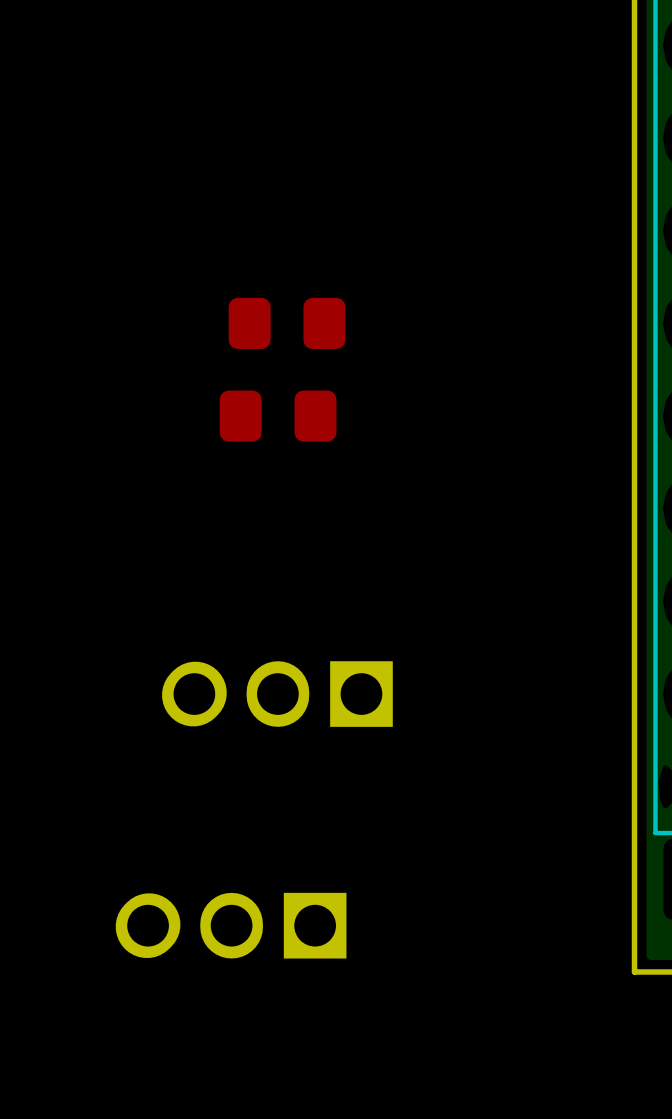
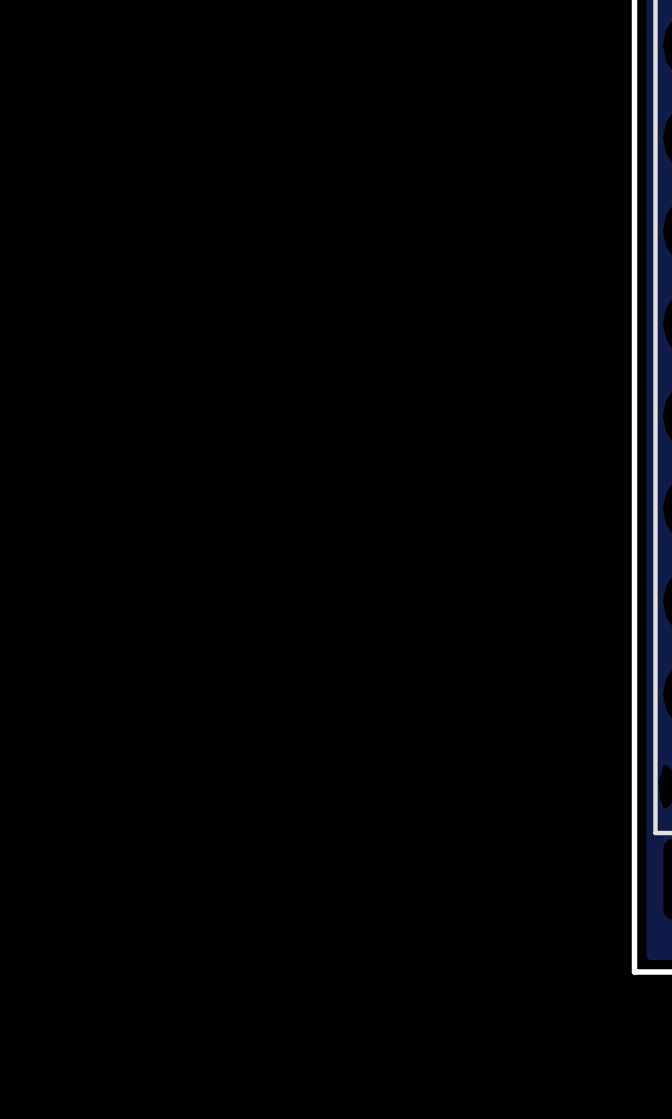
part: (287, 323) -> none
part: (278, 416) -> none
part: (277, 694) -> none
part: (231, 925) -> none

